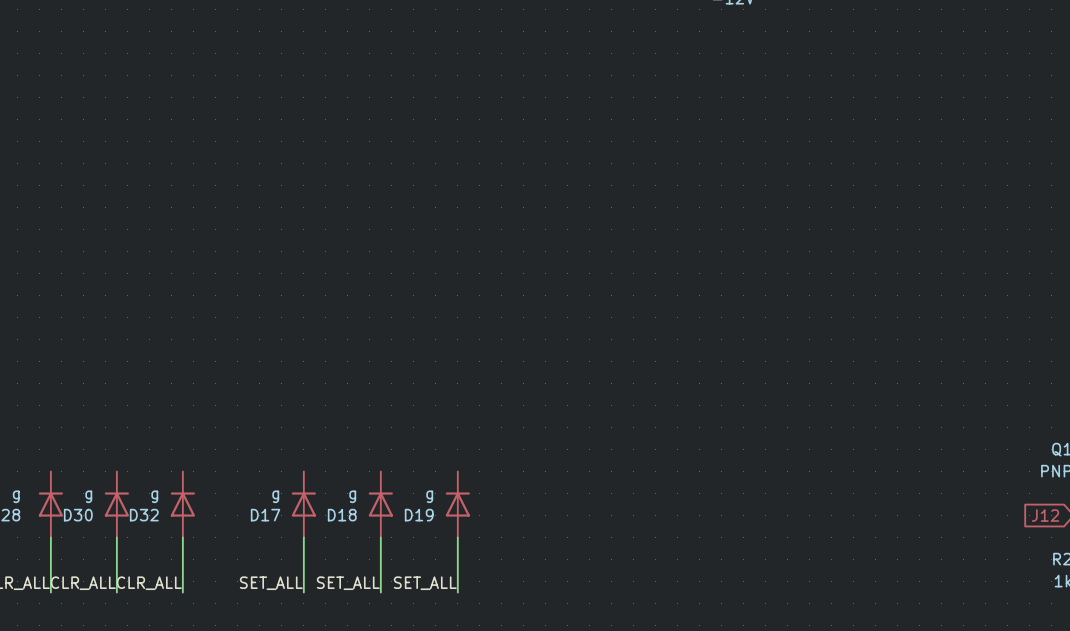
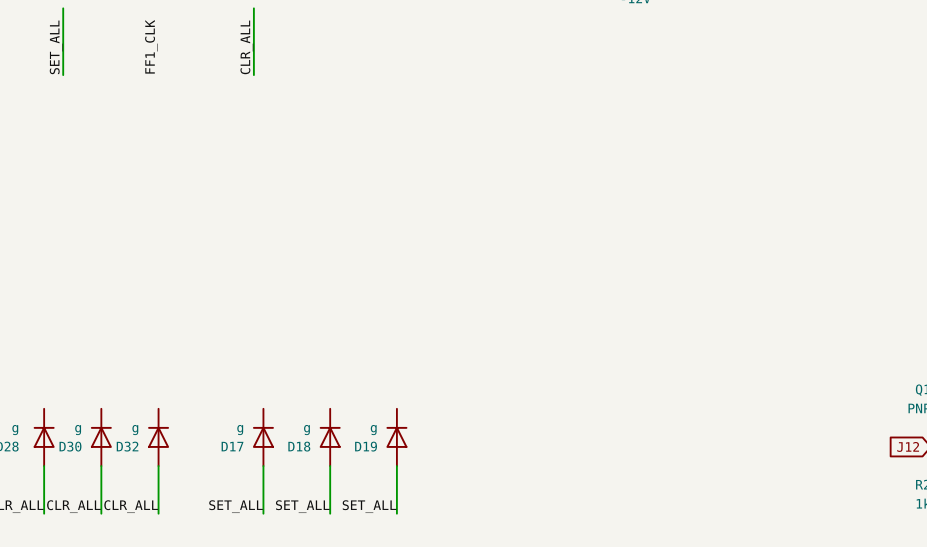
wire: none -> (63, 8) (63, 75)
wire: none -> (253, 8) (253, 75)
label: none -> FF1_CLK (151, 46)
label: none -> CLR_ALL (246, 47)
label: none -> SET_ALL (56, 47)

